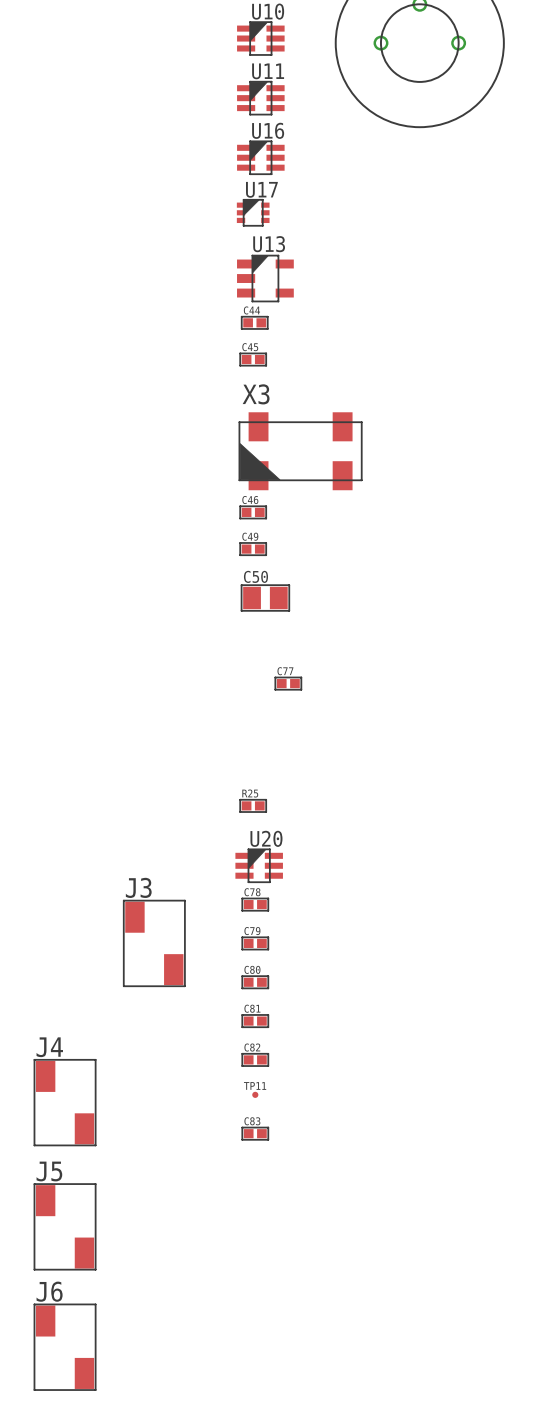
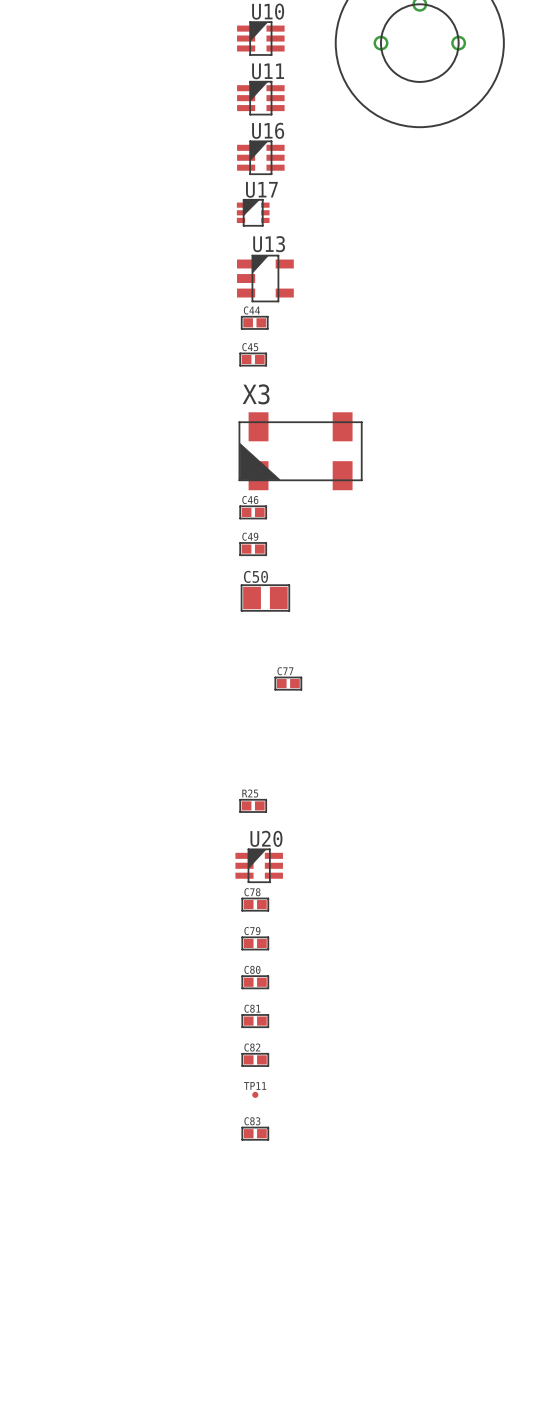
J3: (154, 943) -> none
J4: (65, 1102) -> none
J5: (65, 1226) -> none
J6: (65, 1347) -> none

